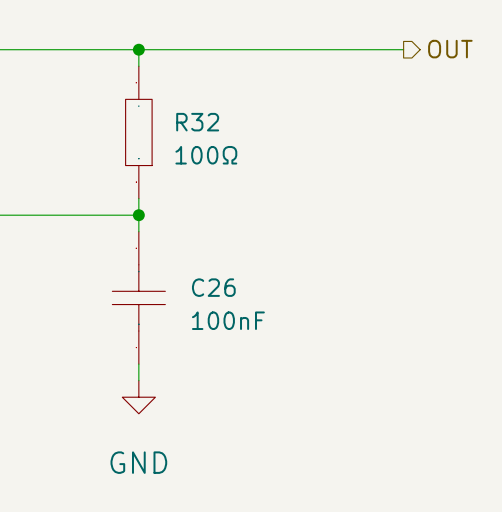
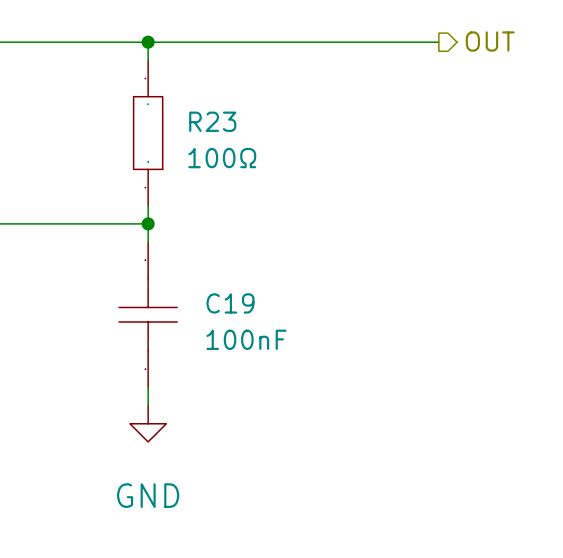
R32 name: R32 (197, 122) -> R23 (212, 121)
C26 name: C26 (213, 287) -> C19 (230, 303)

